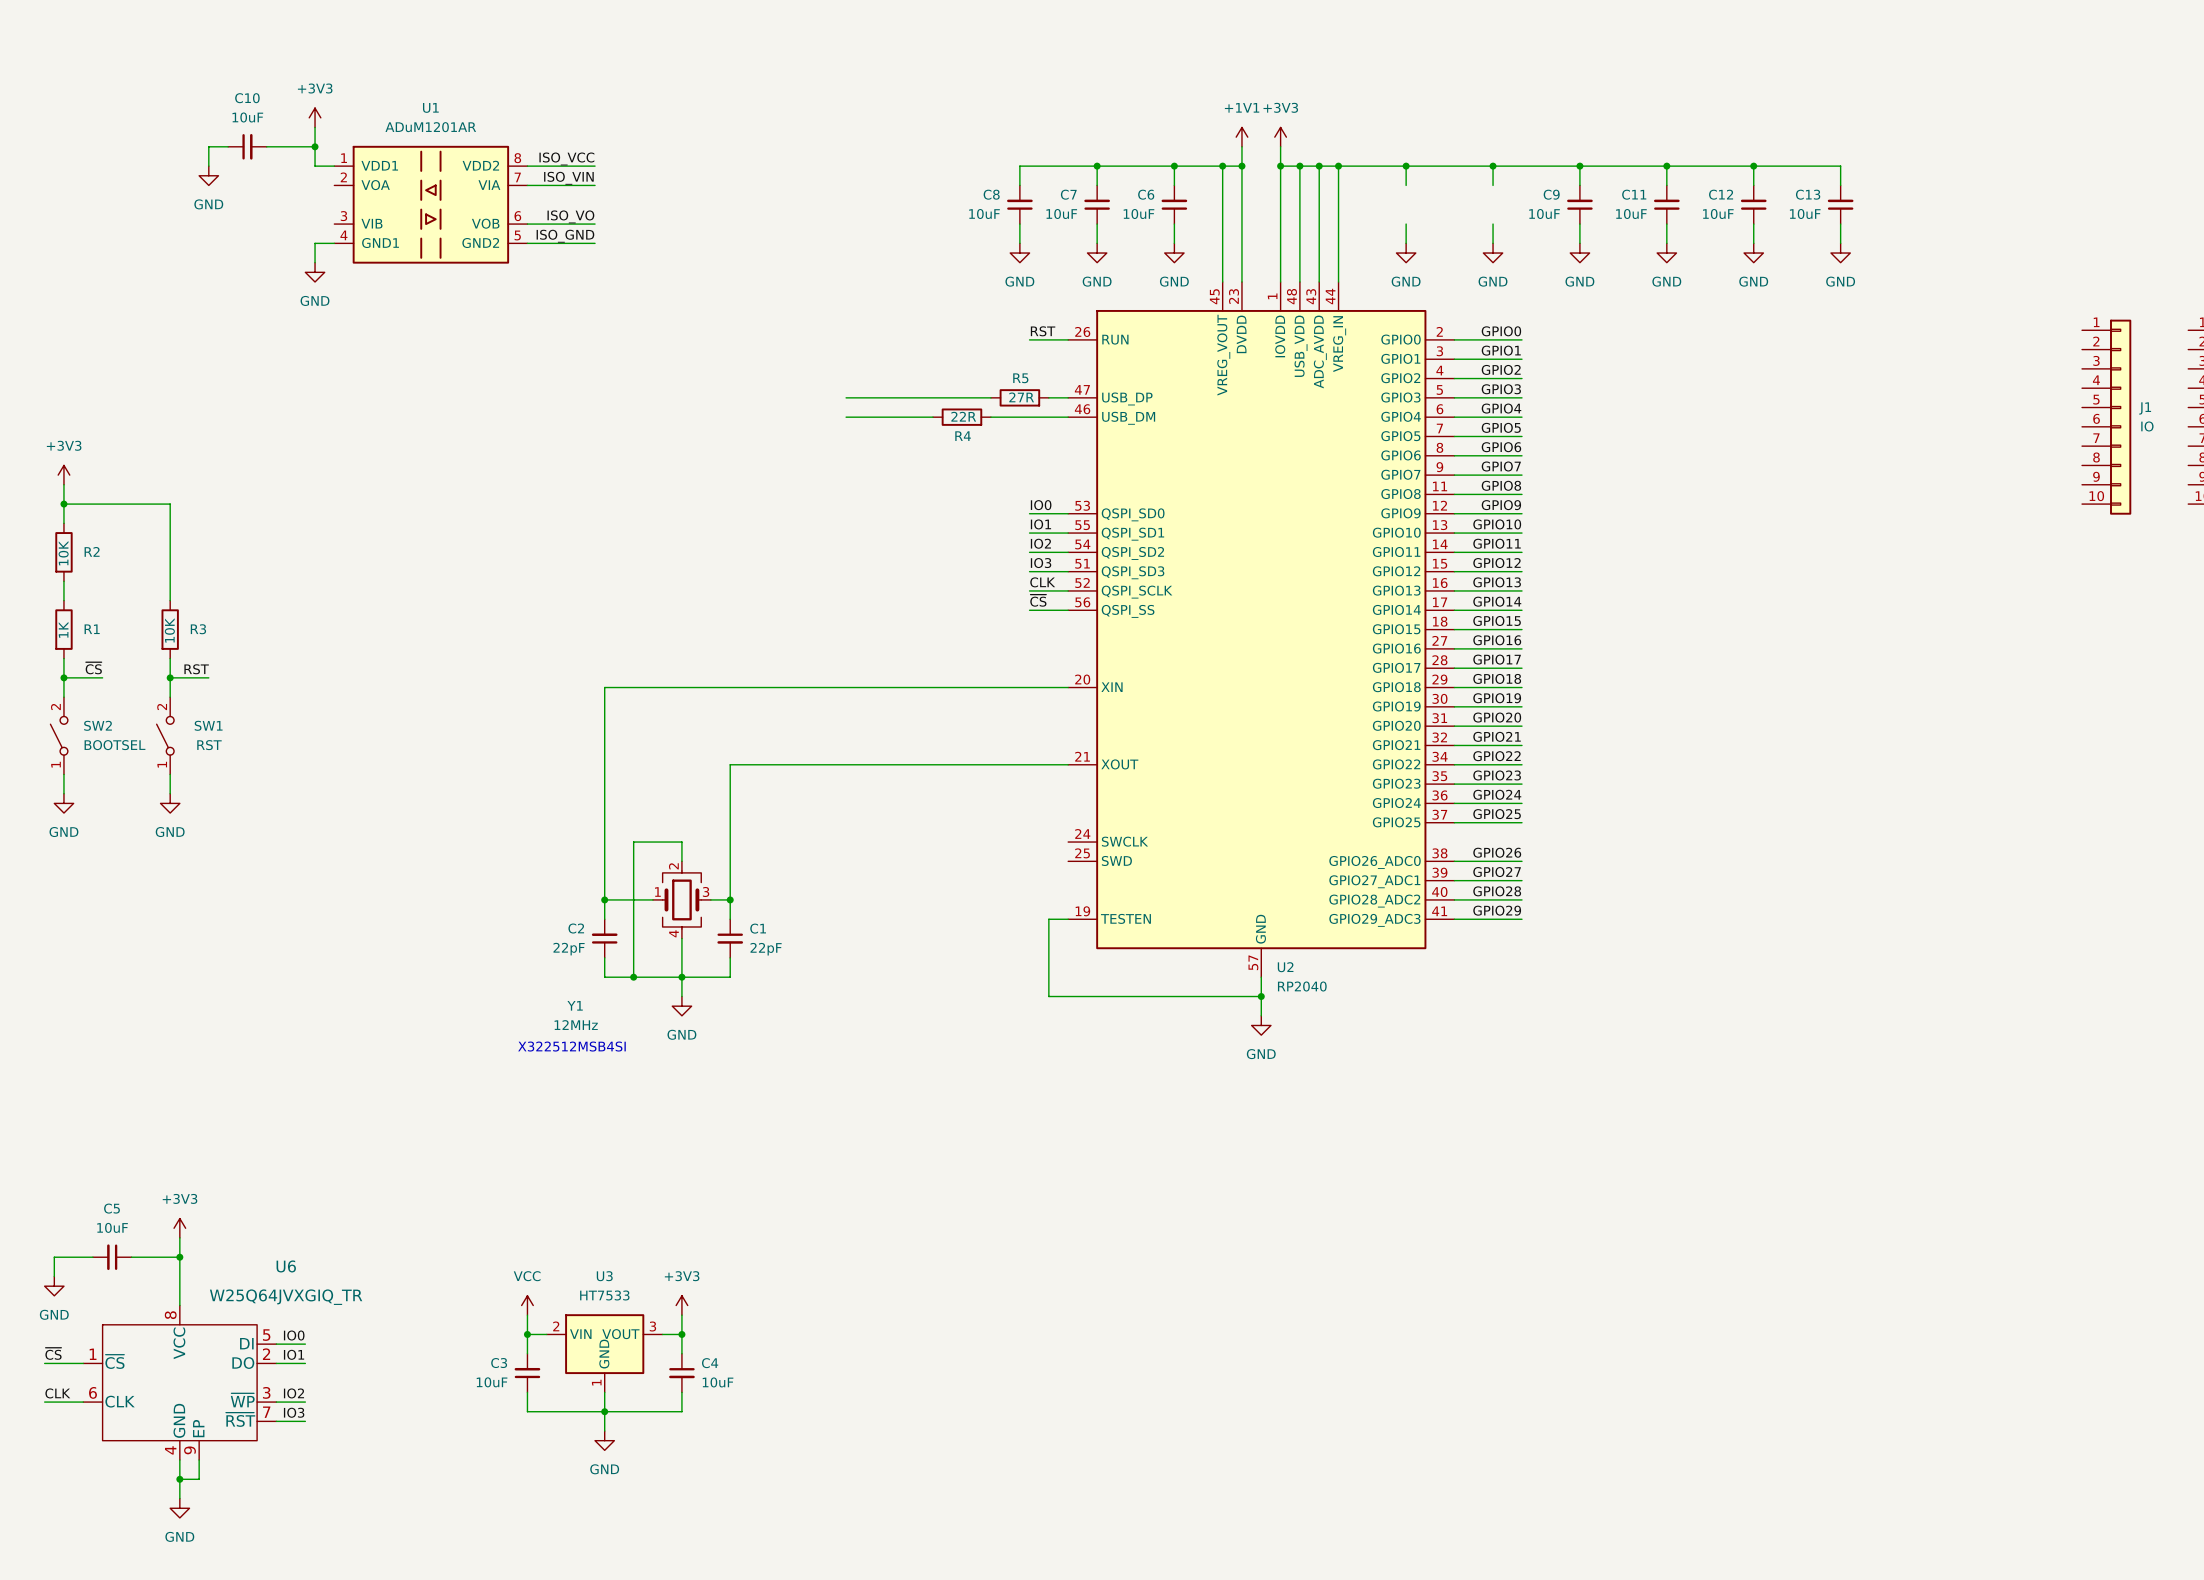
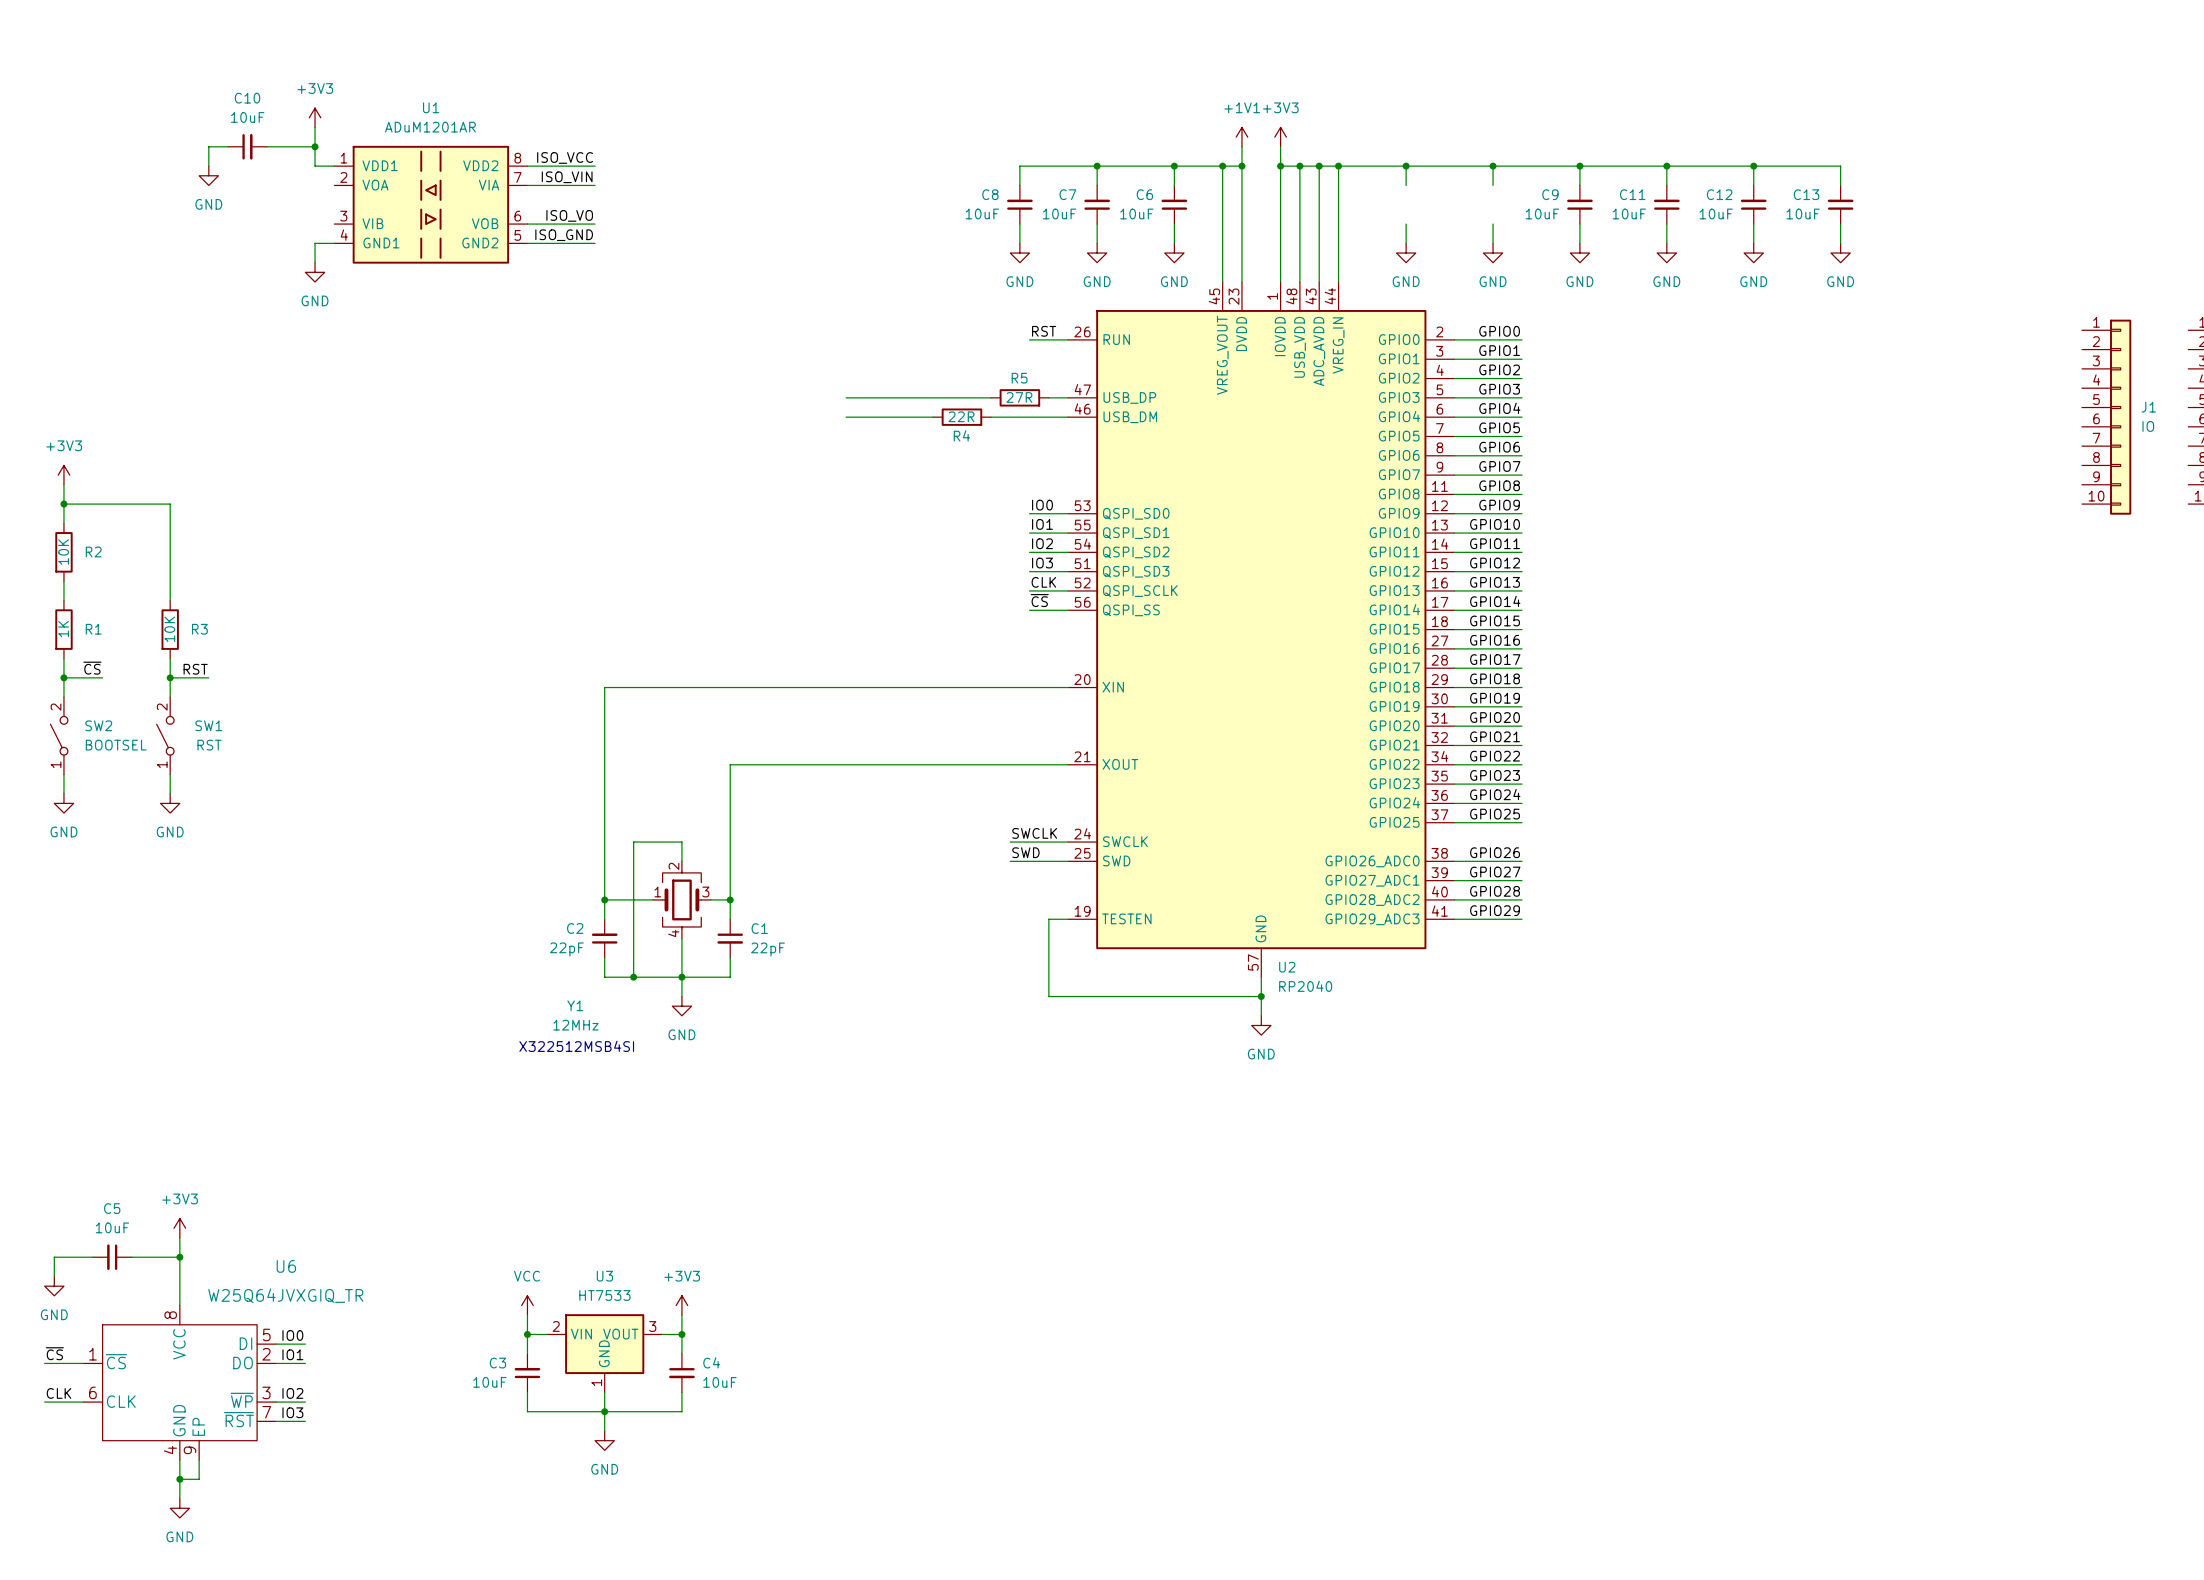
label: none -> SWCLK (1034, 833)
wire: none -> (1010, 842) (1068, 842)
label: none -> SWD (1025, 852)
wire: none -> (1010, 861) (1068, 861)

